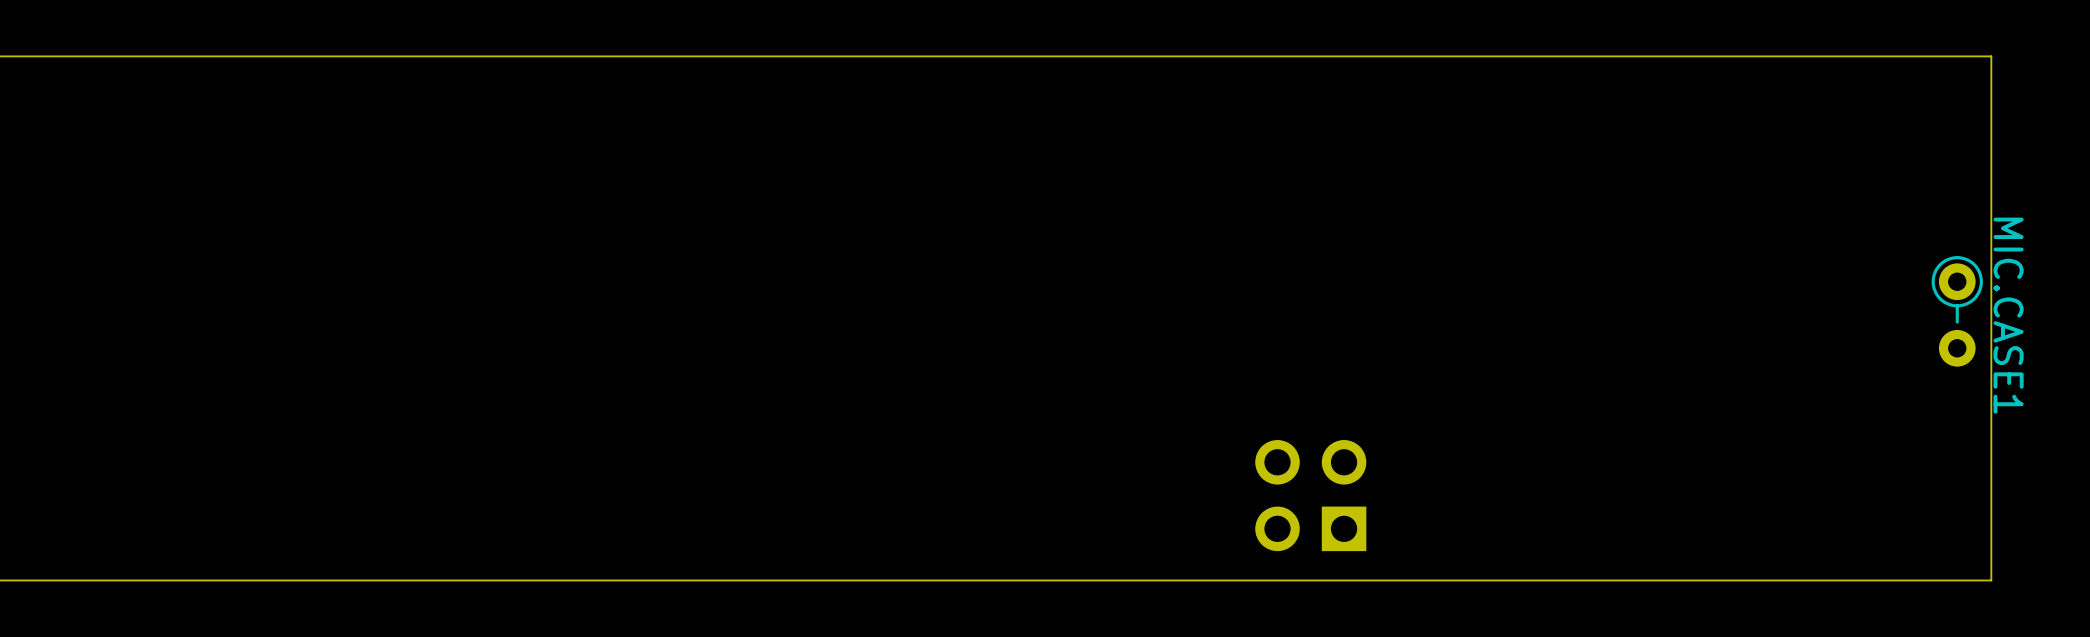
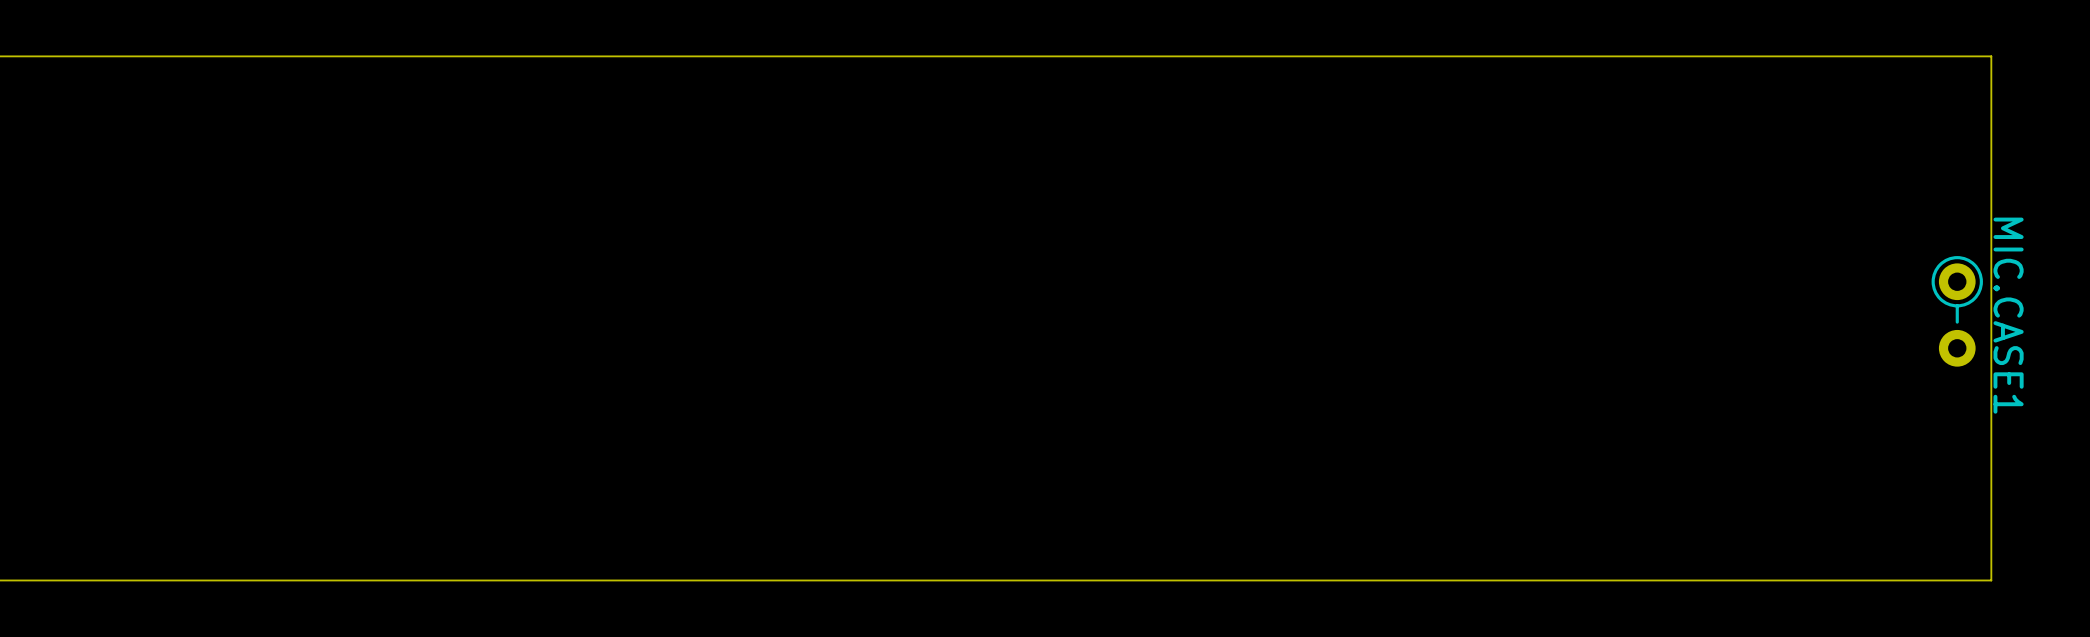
part: (1310, 495) -> none

